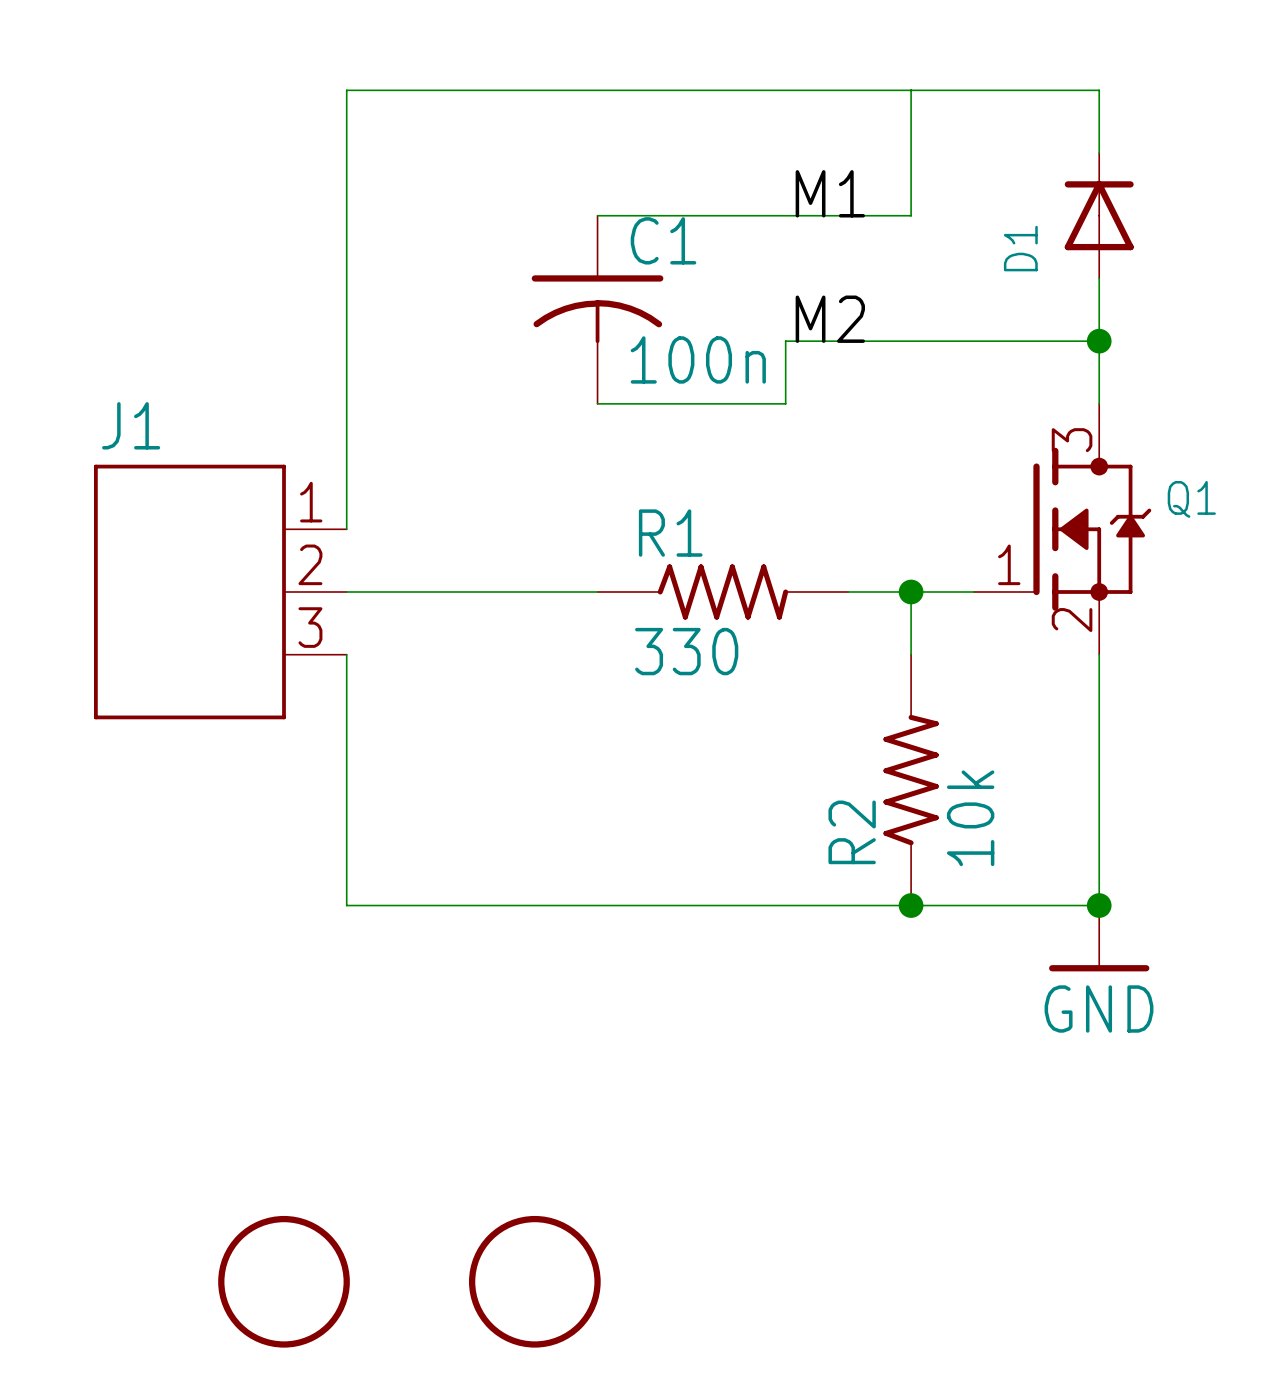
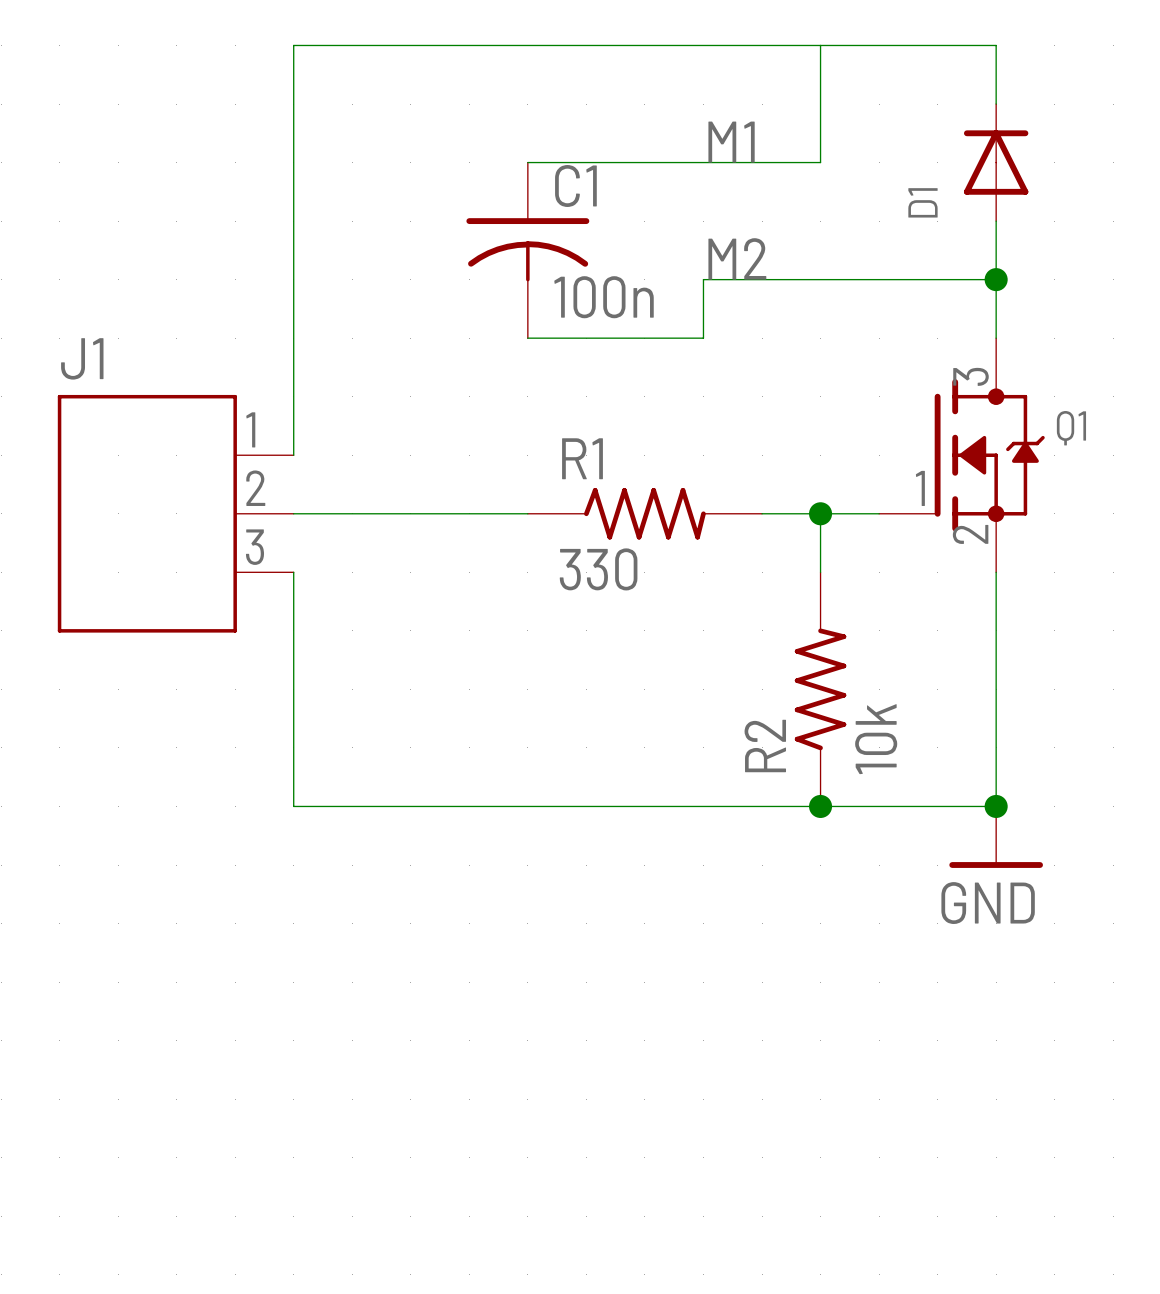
part: (284, 1281) -> none
part: (534, 1281) -> none

